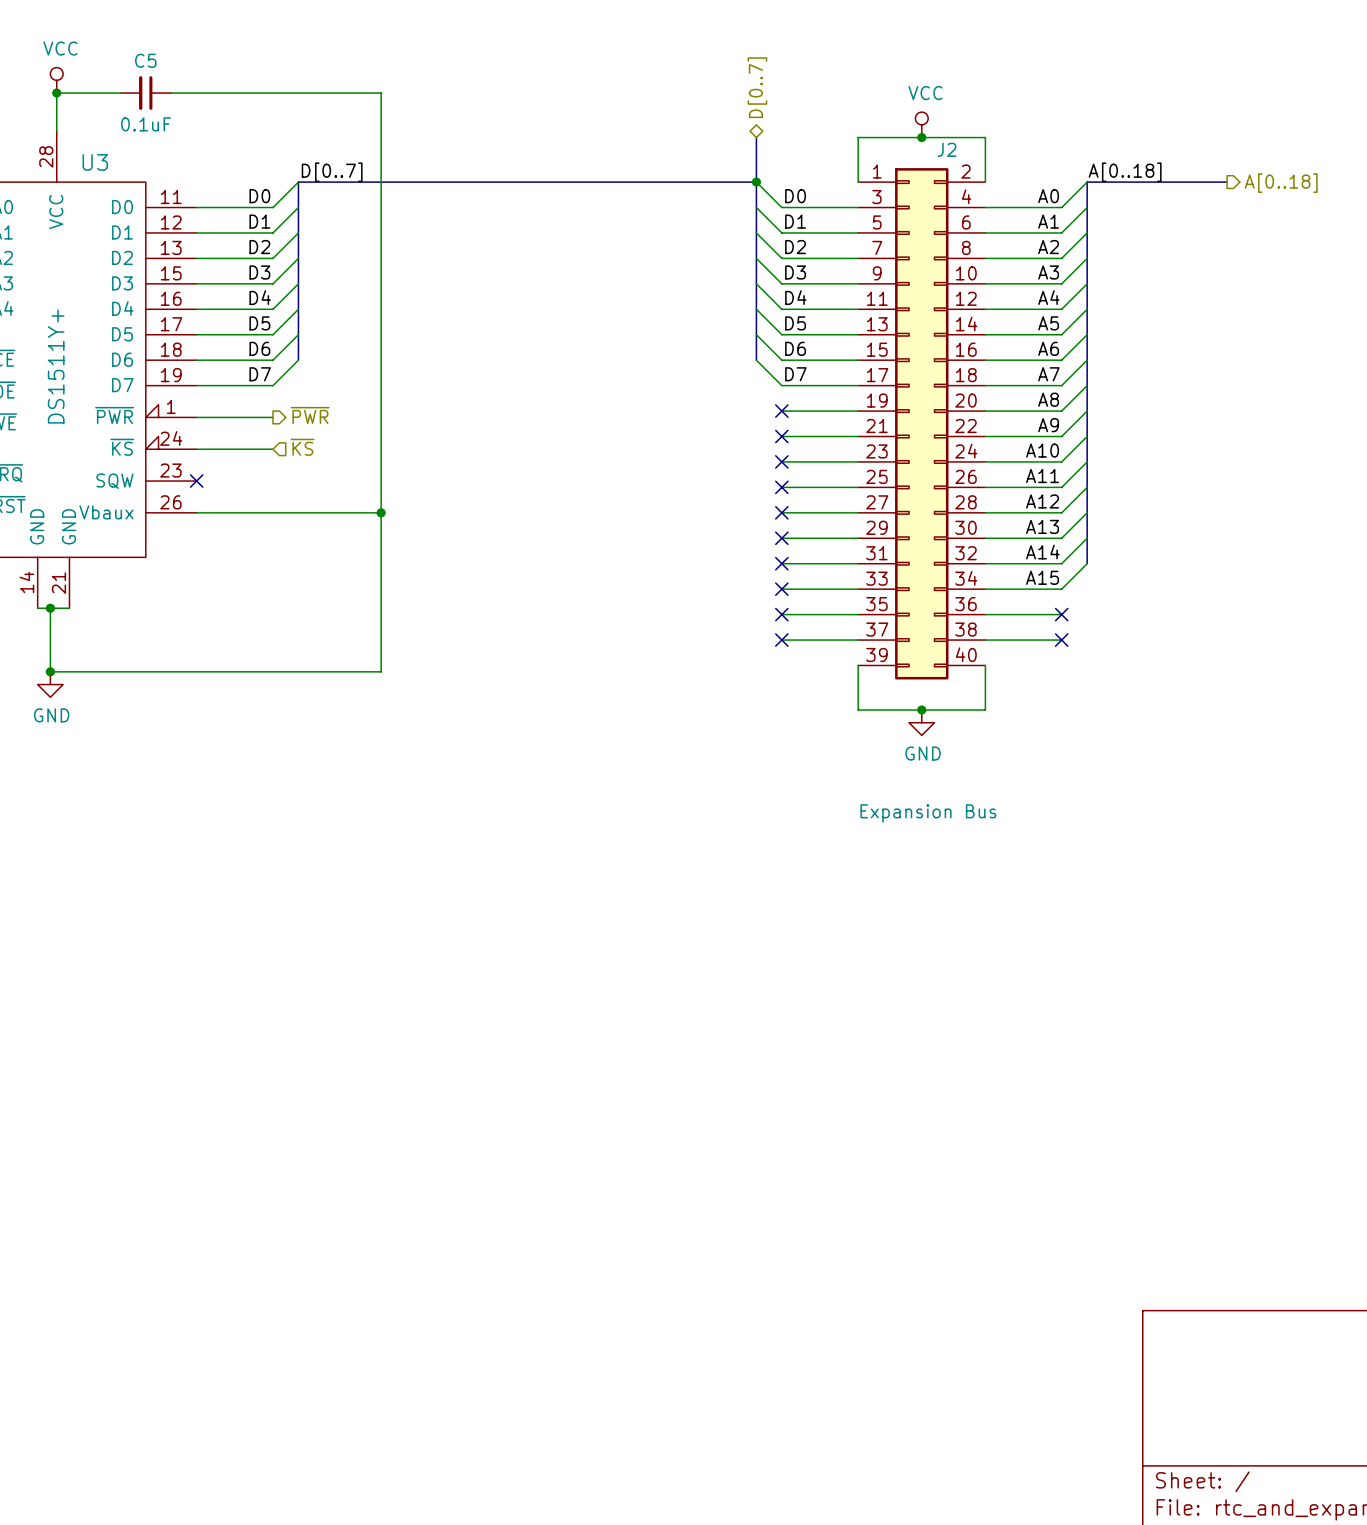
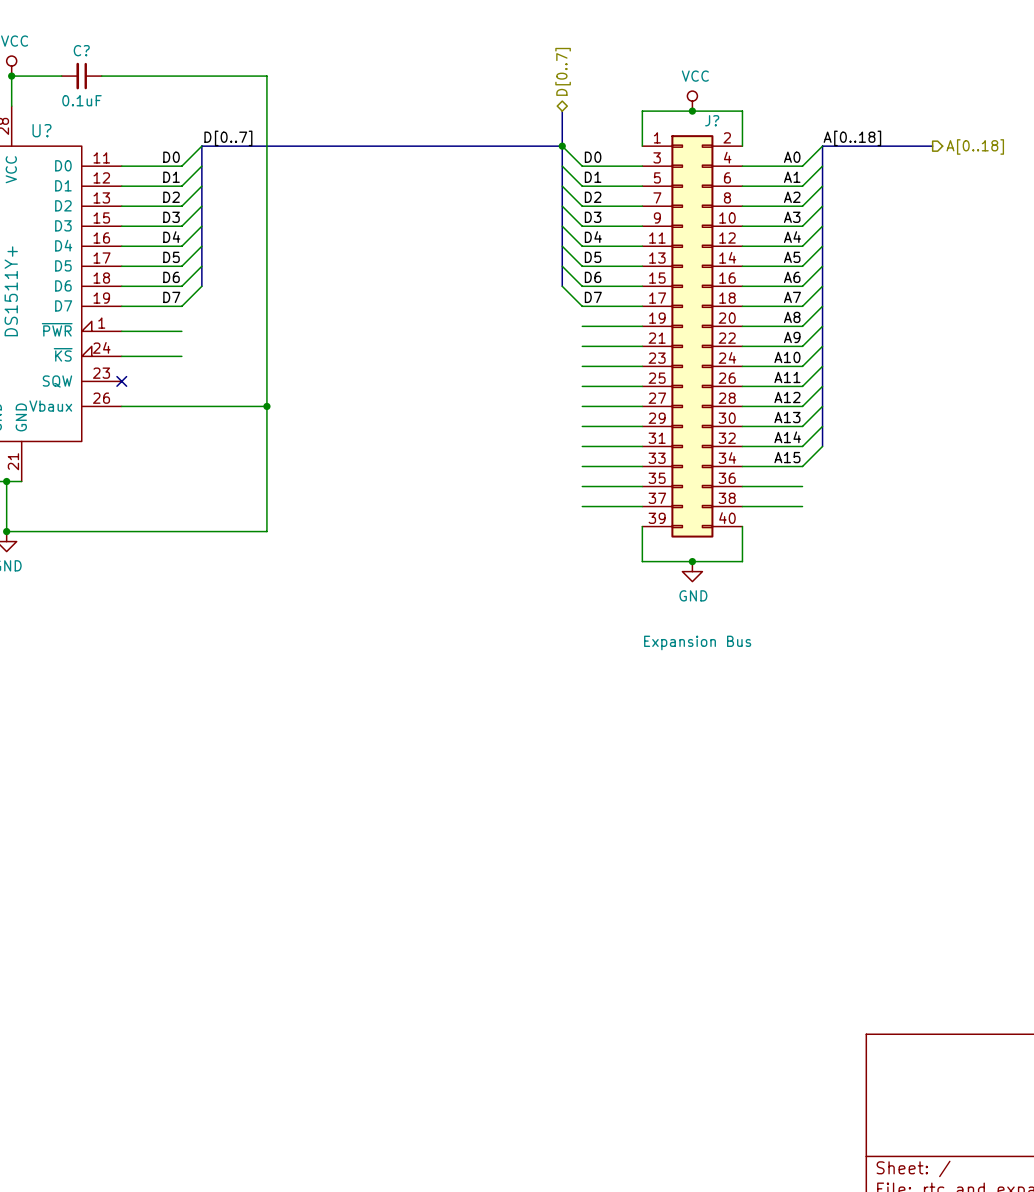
C5 name: C5 (145, 60) -> C? (81, 50)
J2 name: J2 (946, 149) -> J? (712, 120)
U3 name: U3 (95, 162) -> U? (41, 130)
no-connect mark: (781, 411) -> none
hierarchical label: ~{PWR} (310, 415) -> none
no-connect mark: (781, 436) -> none
hierarchical label: ~{KS} (302, 447) -> none
no-connect mark: (781, 461) -> none
no-connect mark: (781, 487) -> none
no-connect mark: (781, 512) -> none
no-connect mark: (781, 538) -> none
no-connect mark: (781, 563) -> none
no-connect mark: (781, 589) -> none
no-connect mark: (781, 614) -> none
no-connect mark: (1061, 614) -> none
no-connect mark: (781, 640) -> none
no-connect mark: (1061, 640) -> none

